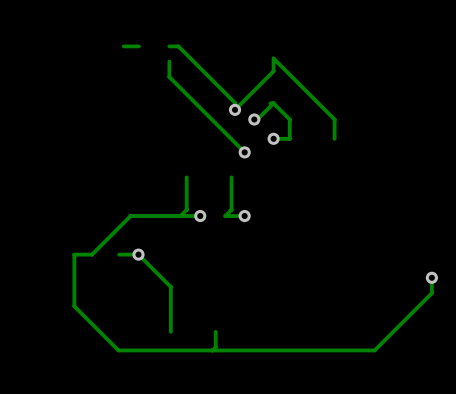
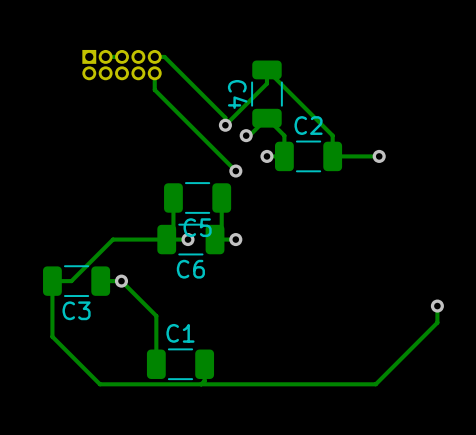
part: none -> (122, 65)
C4: none -> (266, 94)
C2: none -> (308, 156)
track: none -> (379, 156) (332, 156)
via: none -> (379, 156)
C5: none -> (197, 197)
C6: none -> (190, 239)
C3: none -> (76, 281)
C1: none -> (180, 364)

